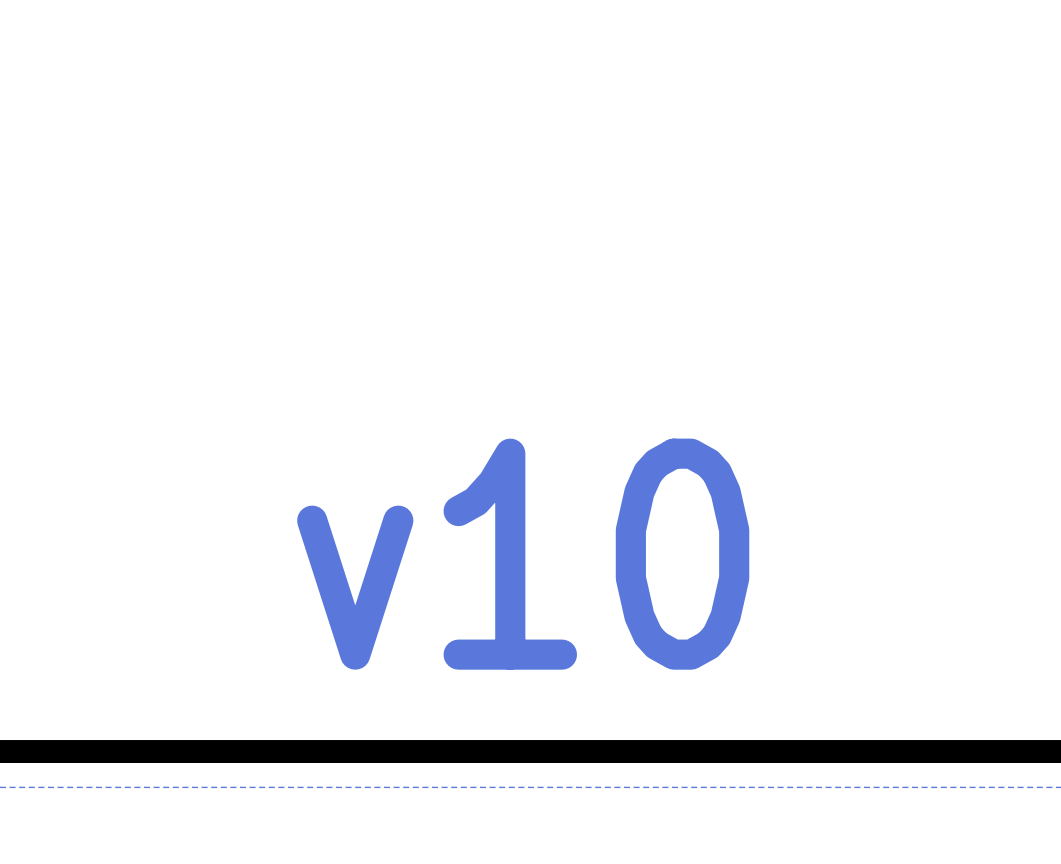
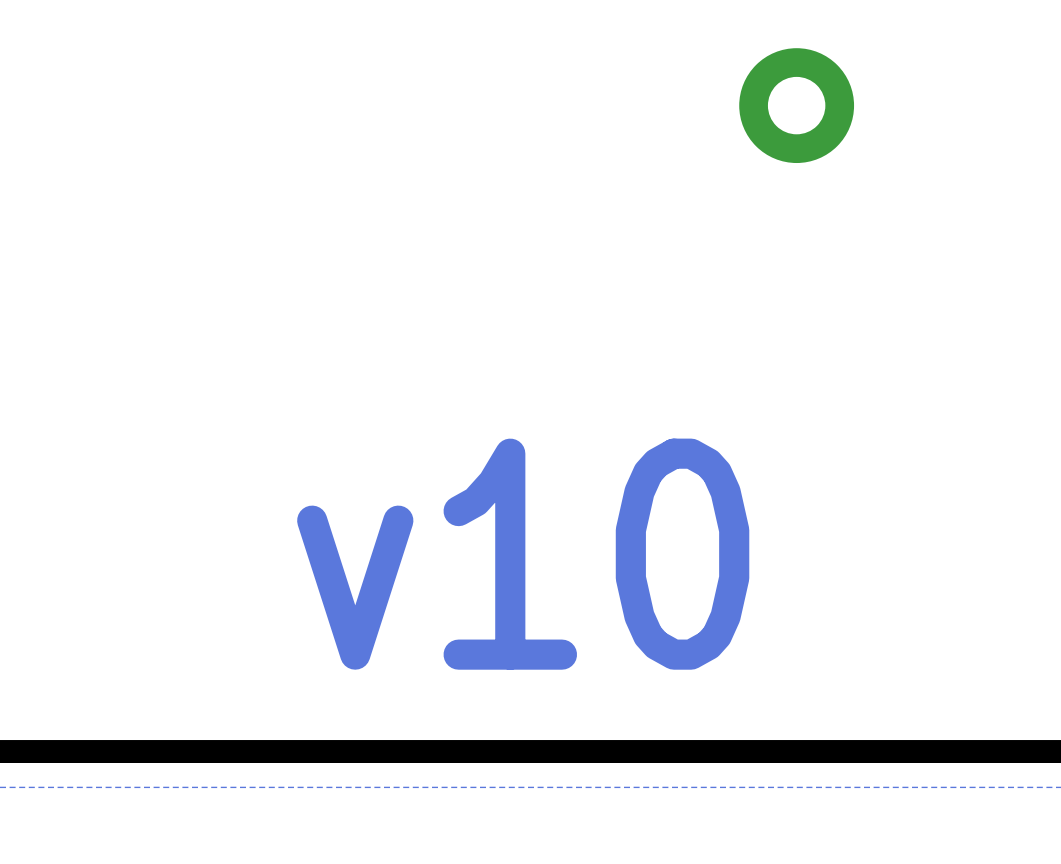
via: none -> (796, 105)

